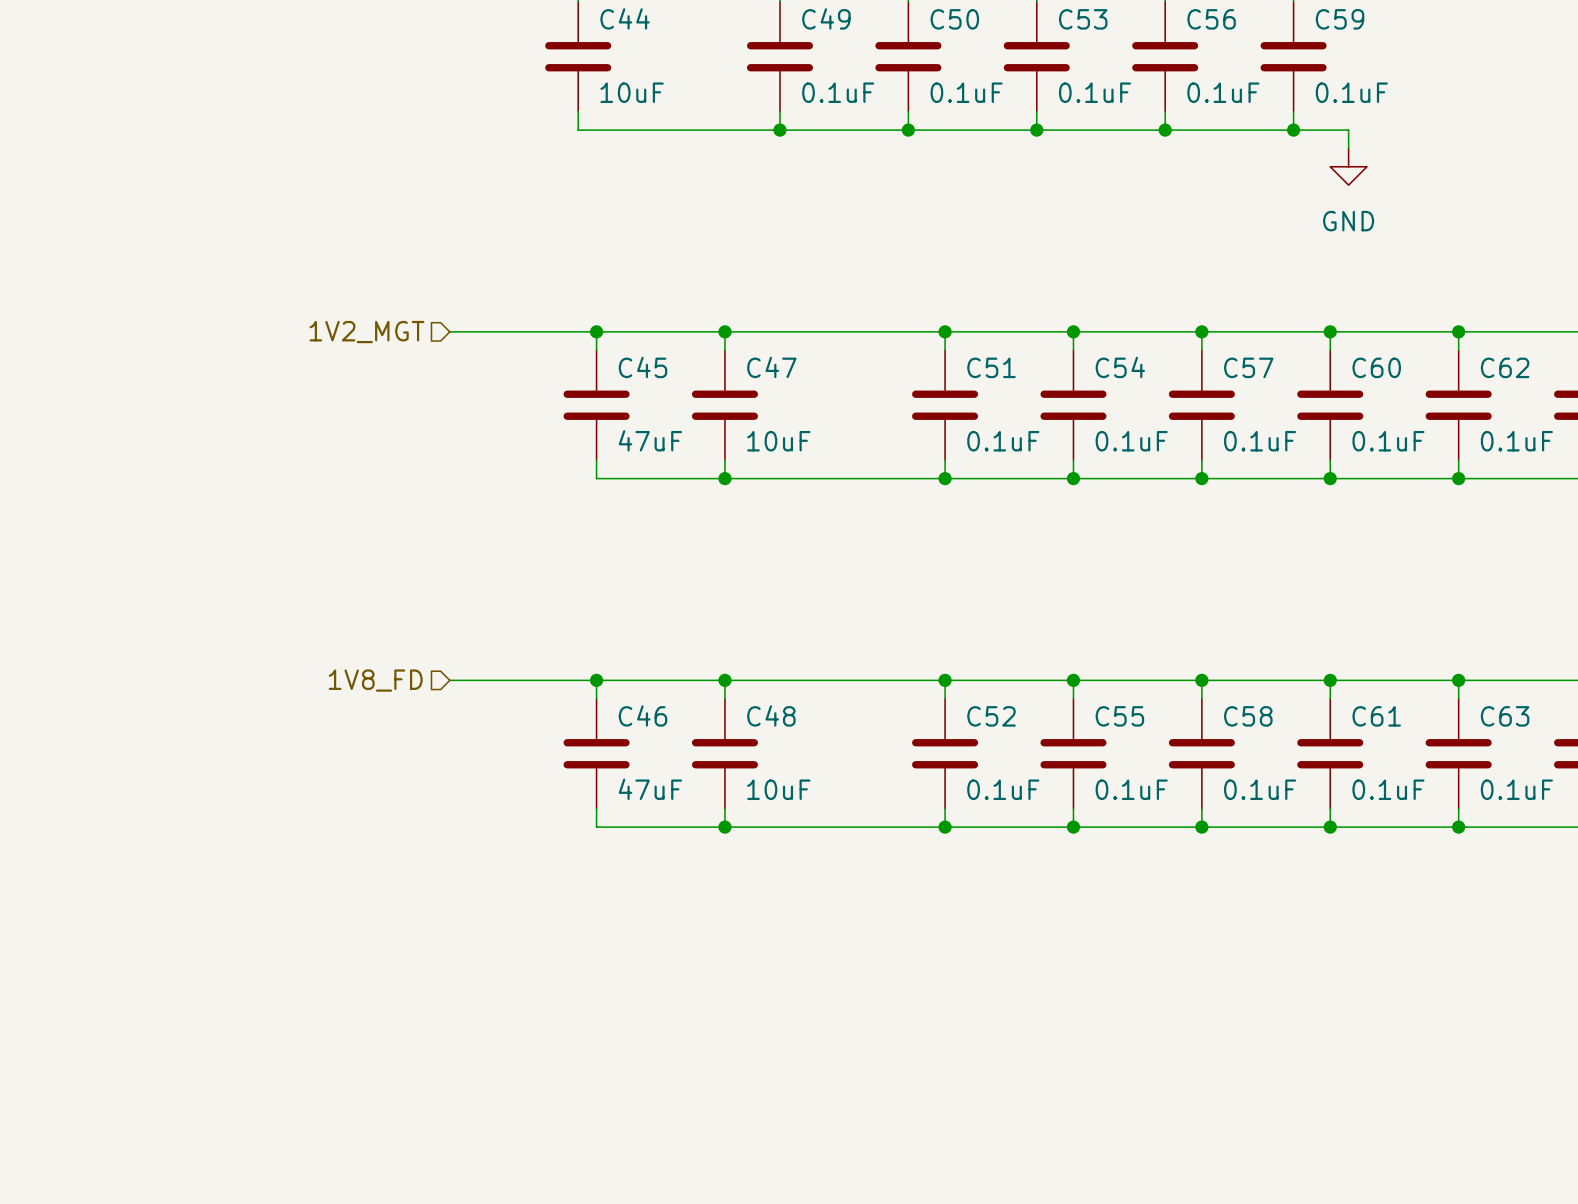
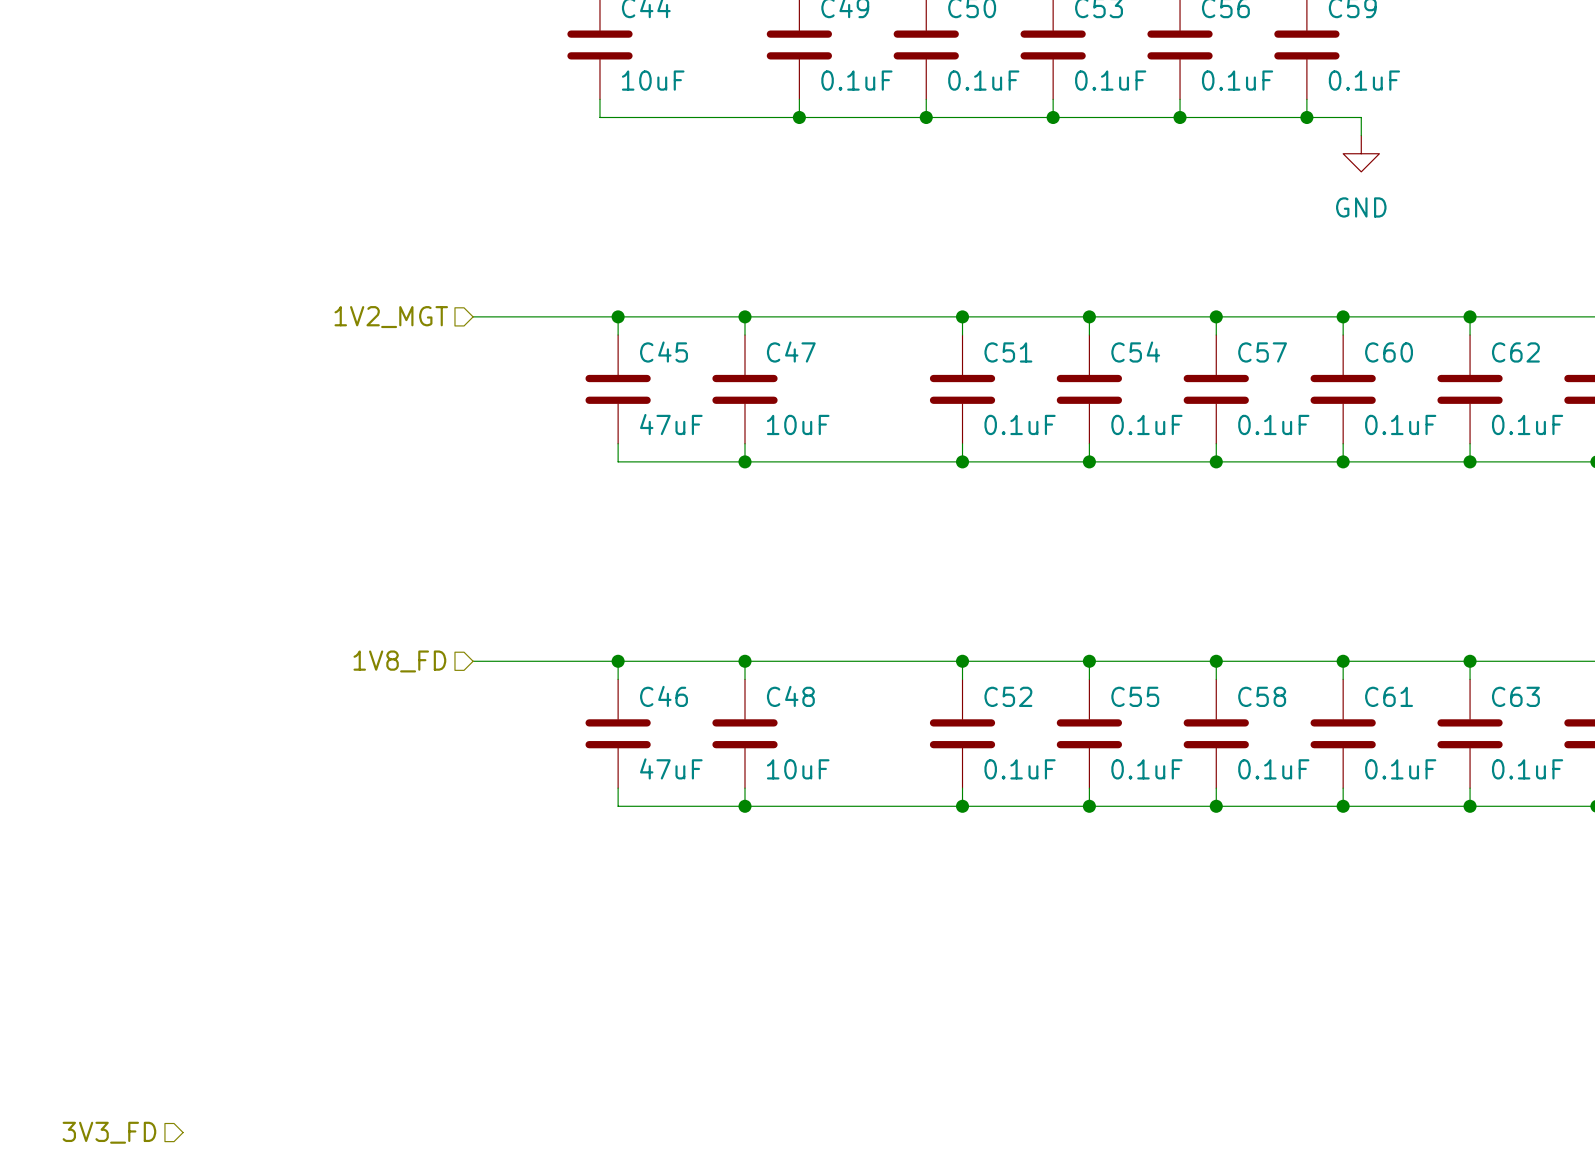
hierarchical label: none -> 3V3_FD (109, 1132)

